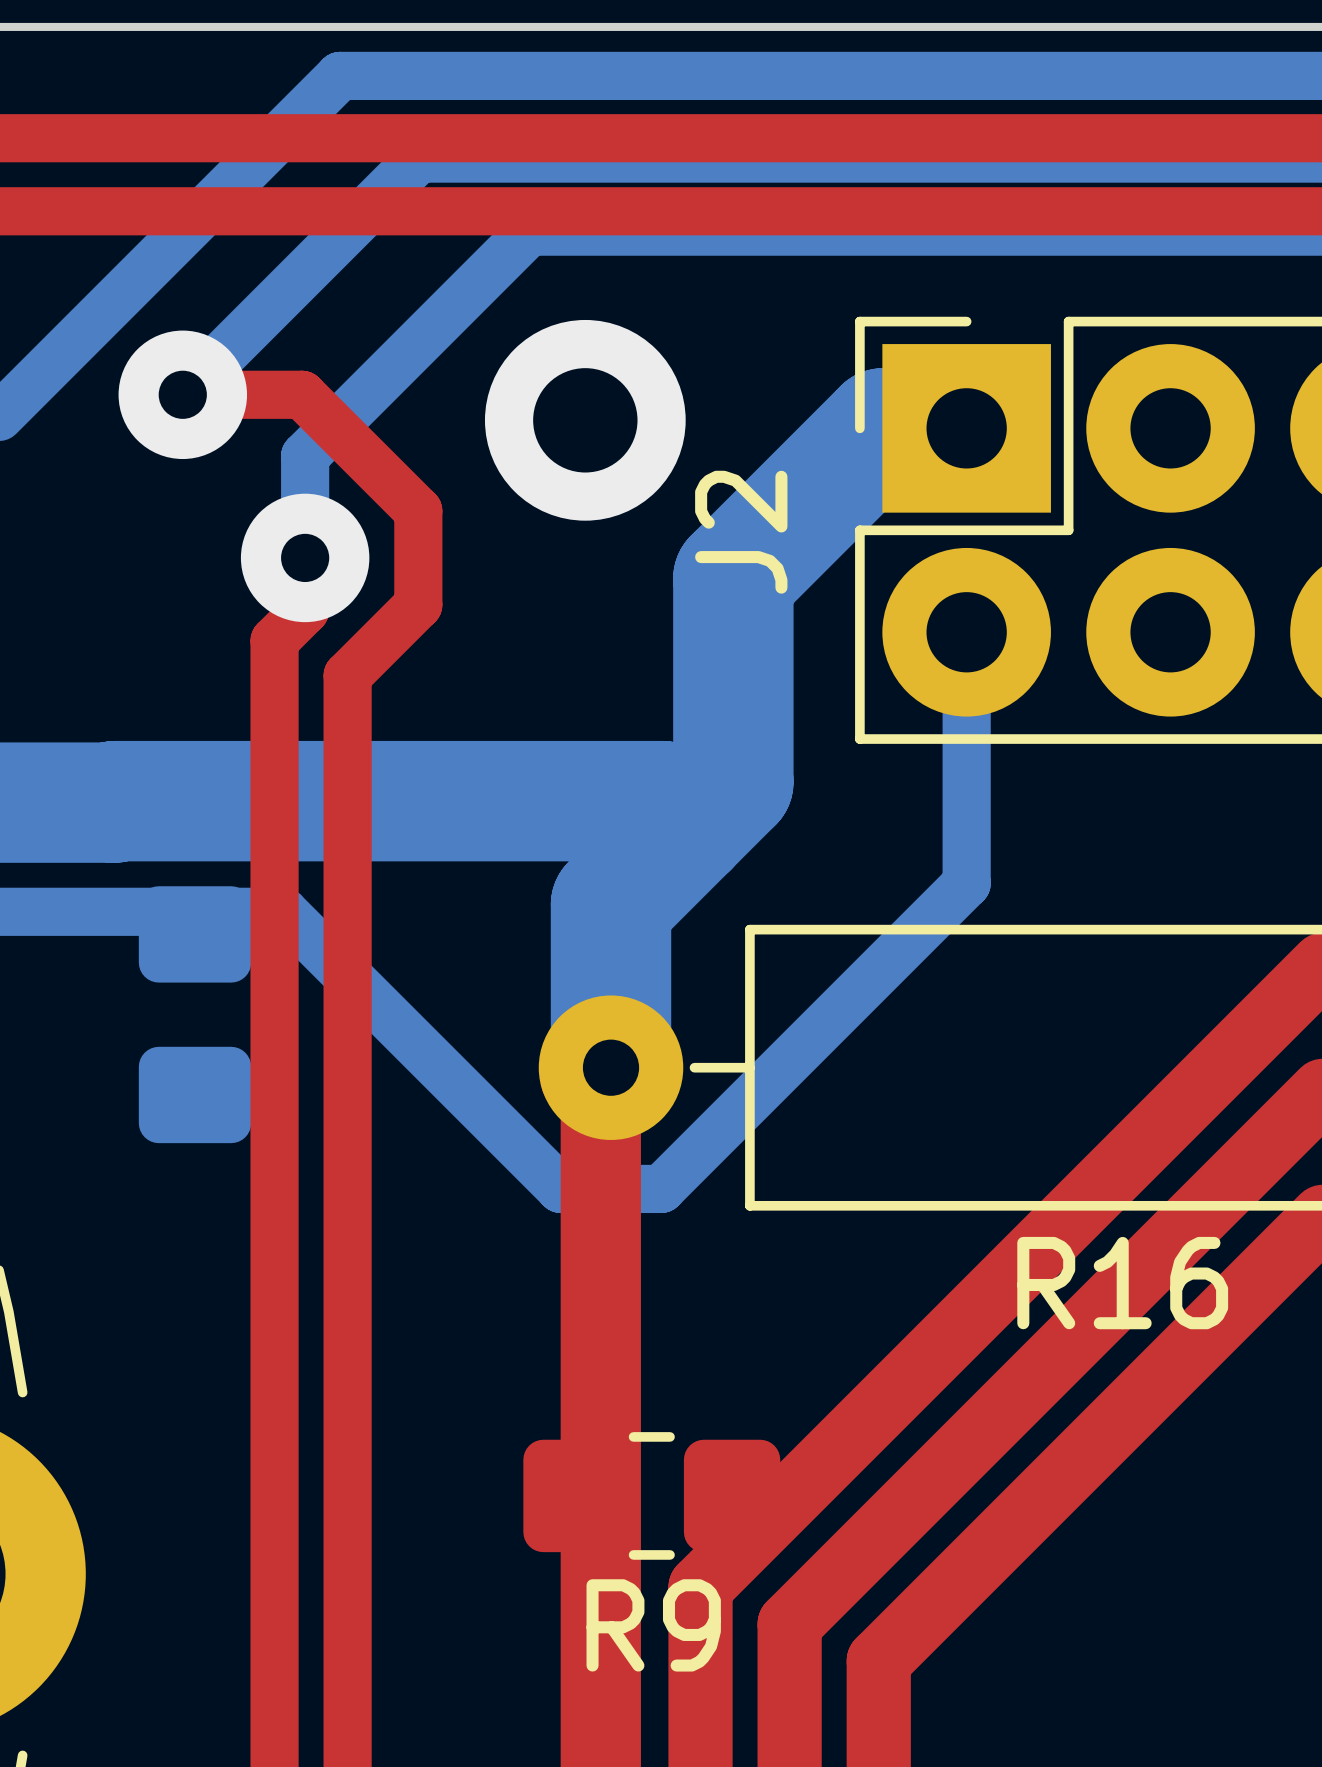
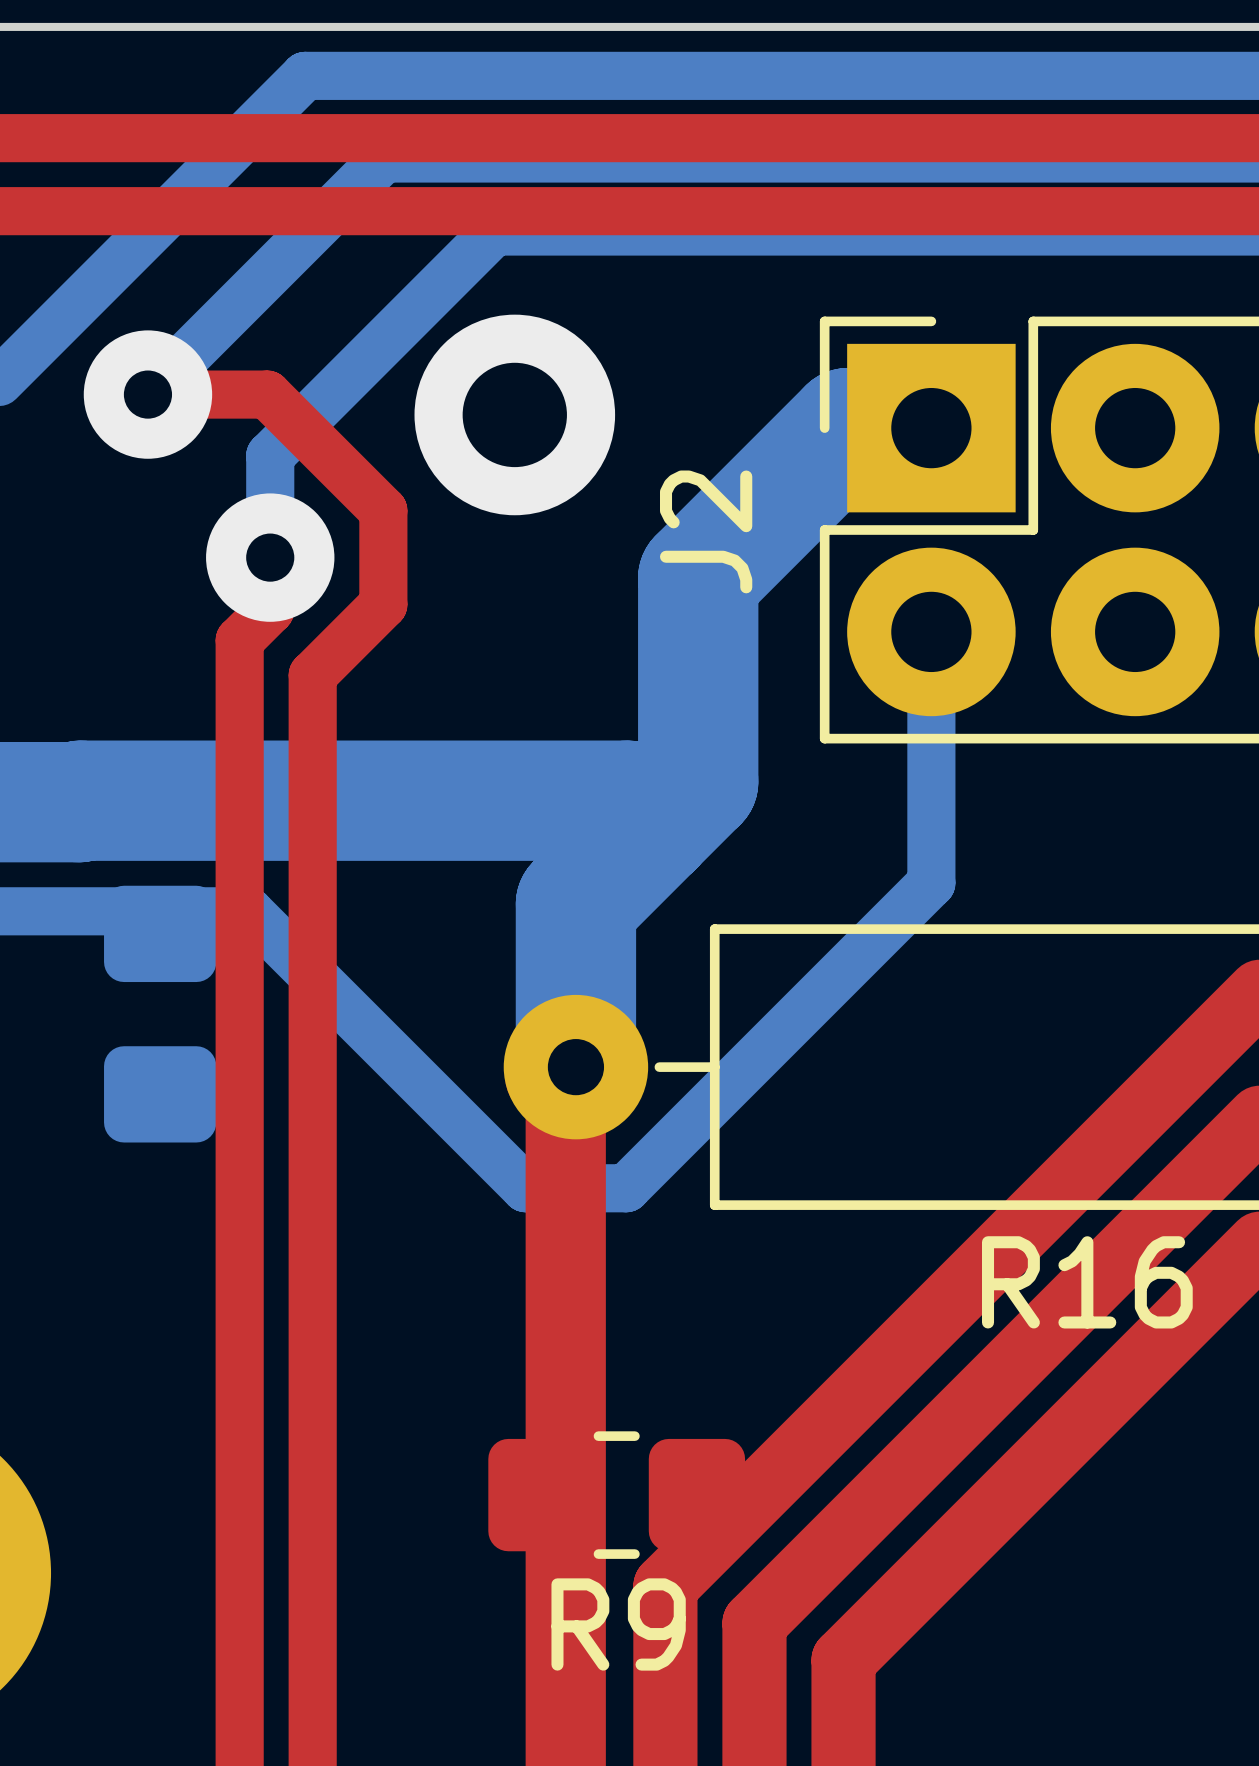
via position: (585, 420) -> (514, 414)

